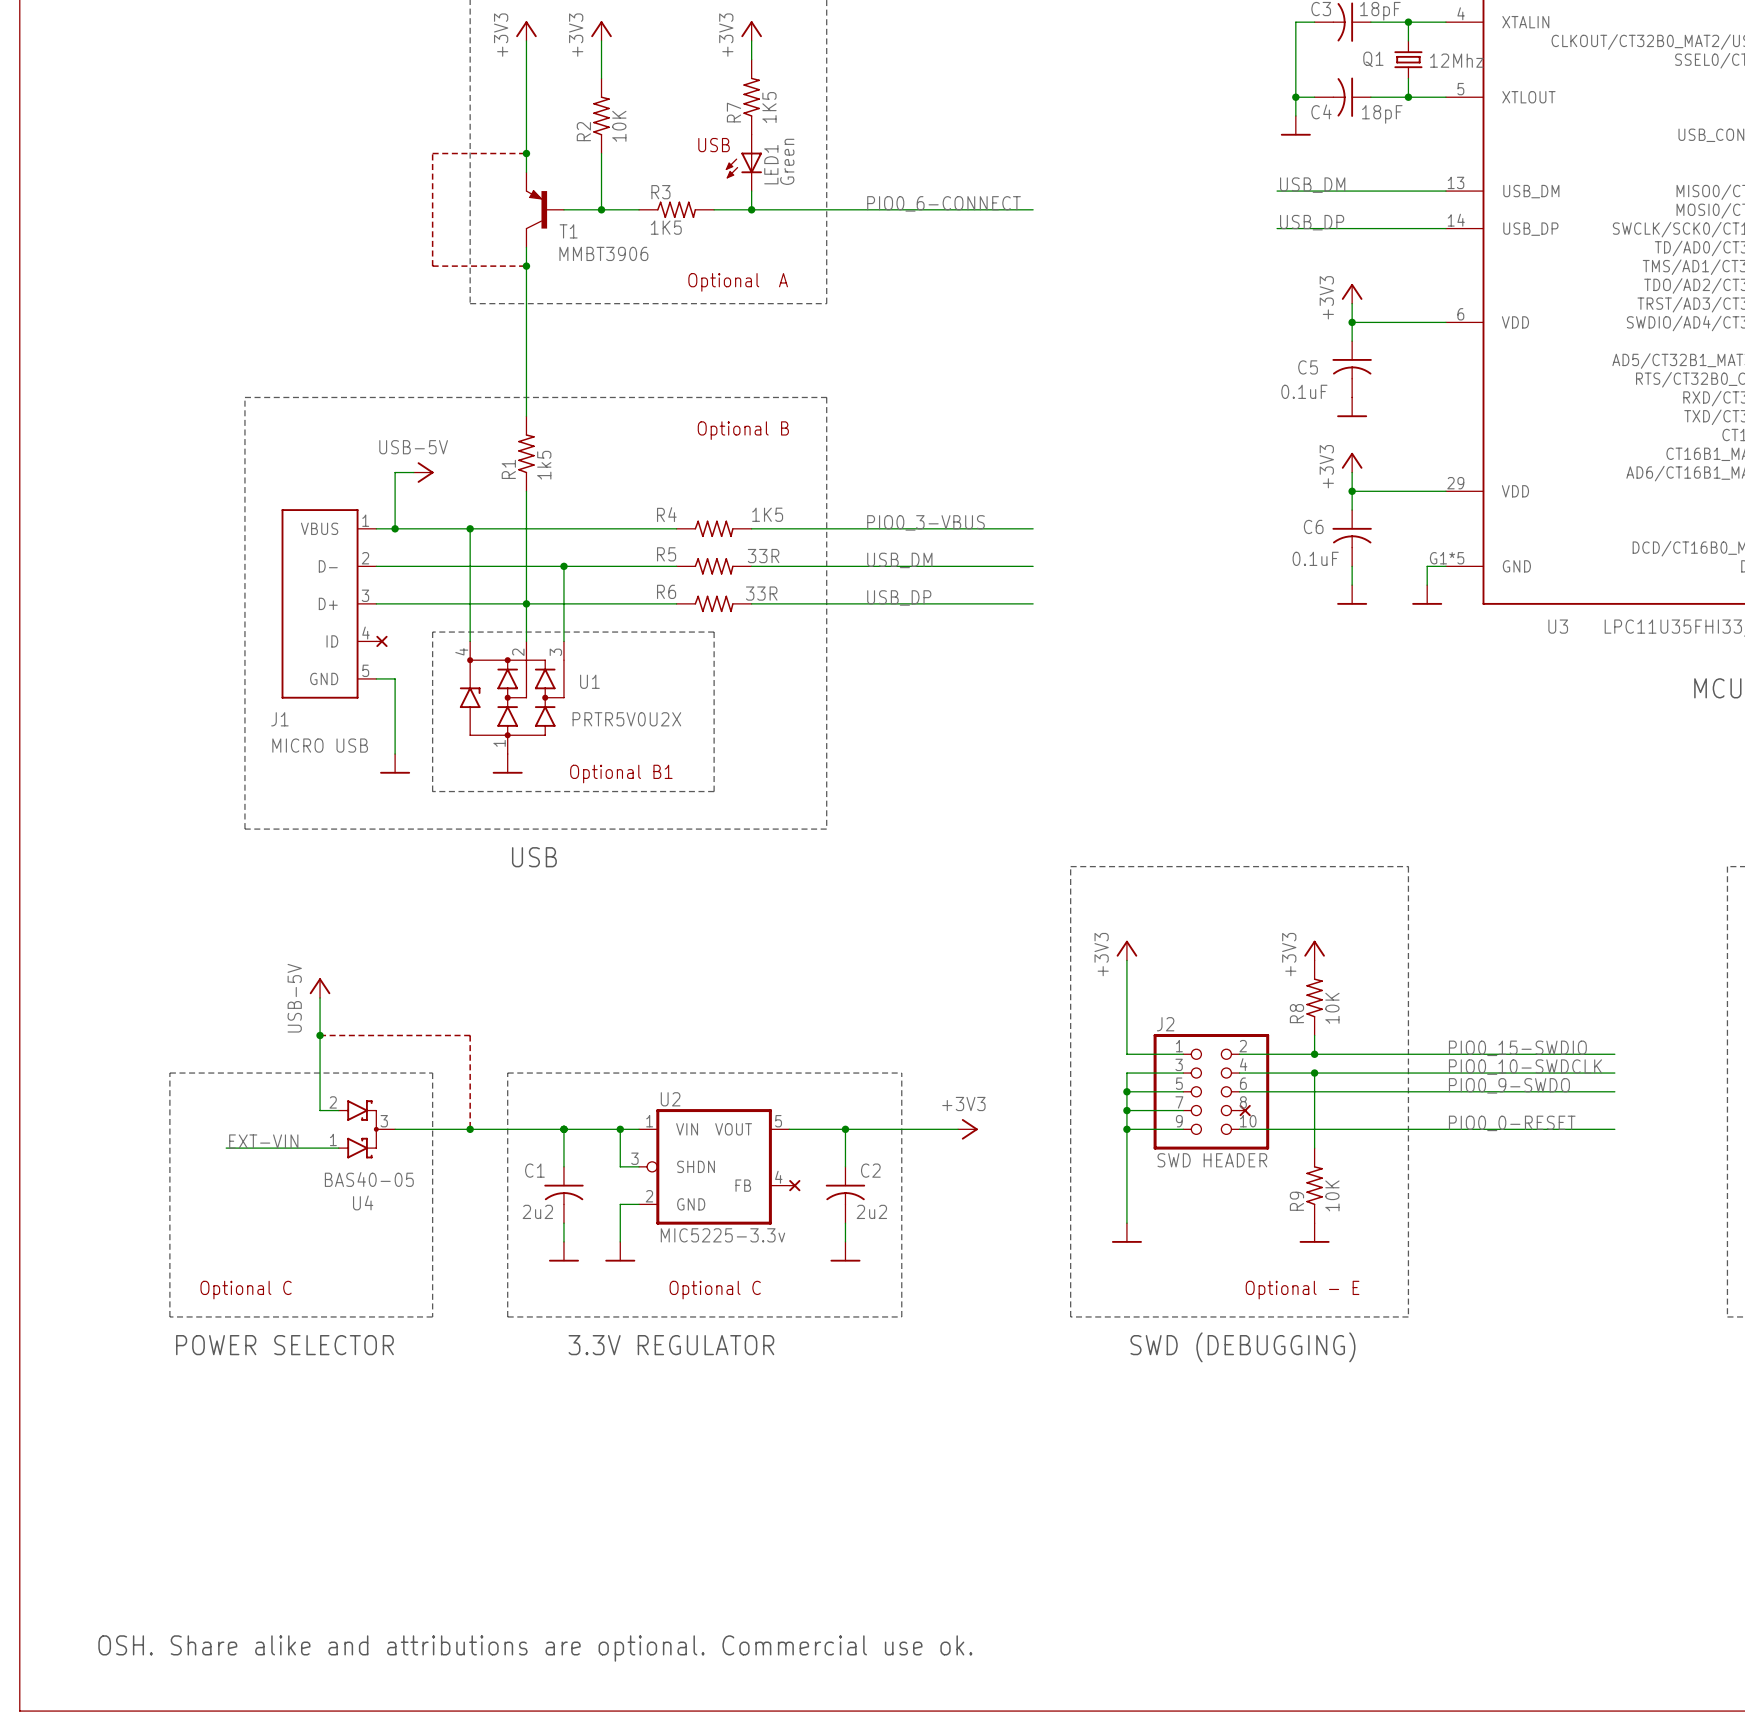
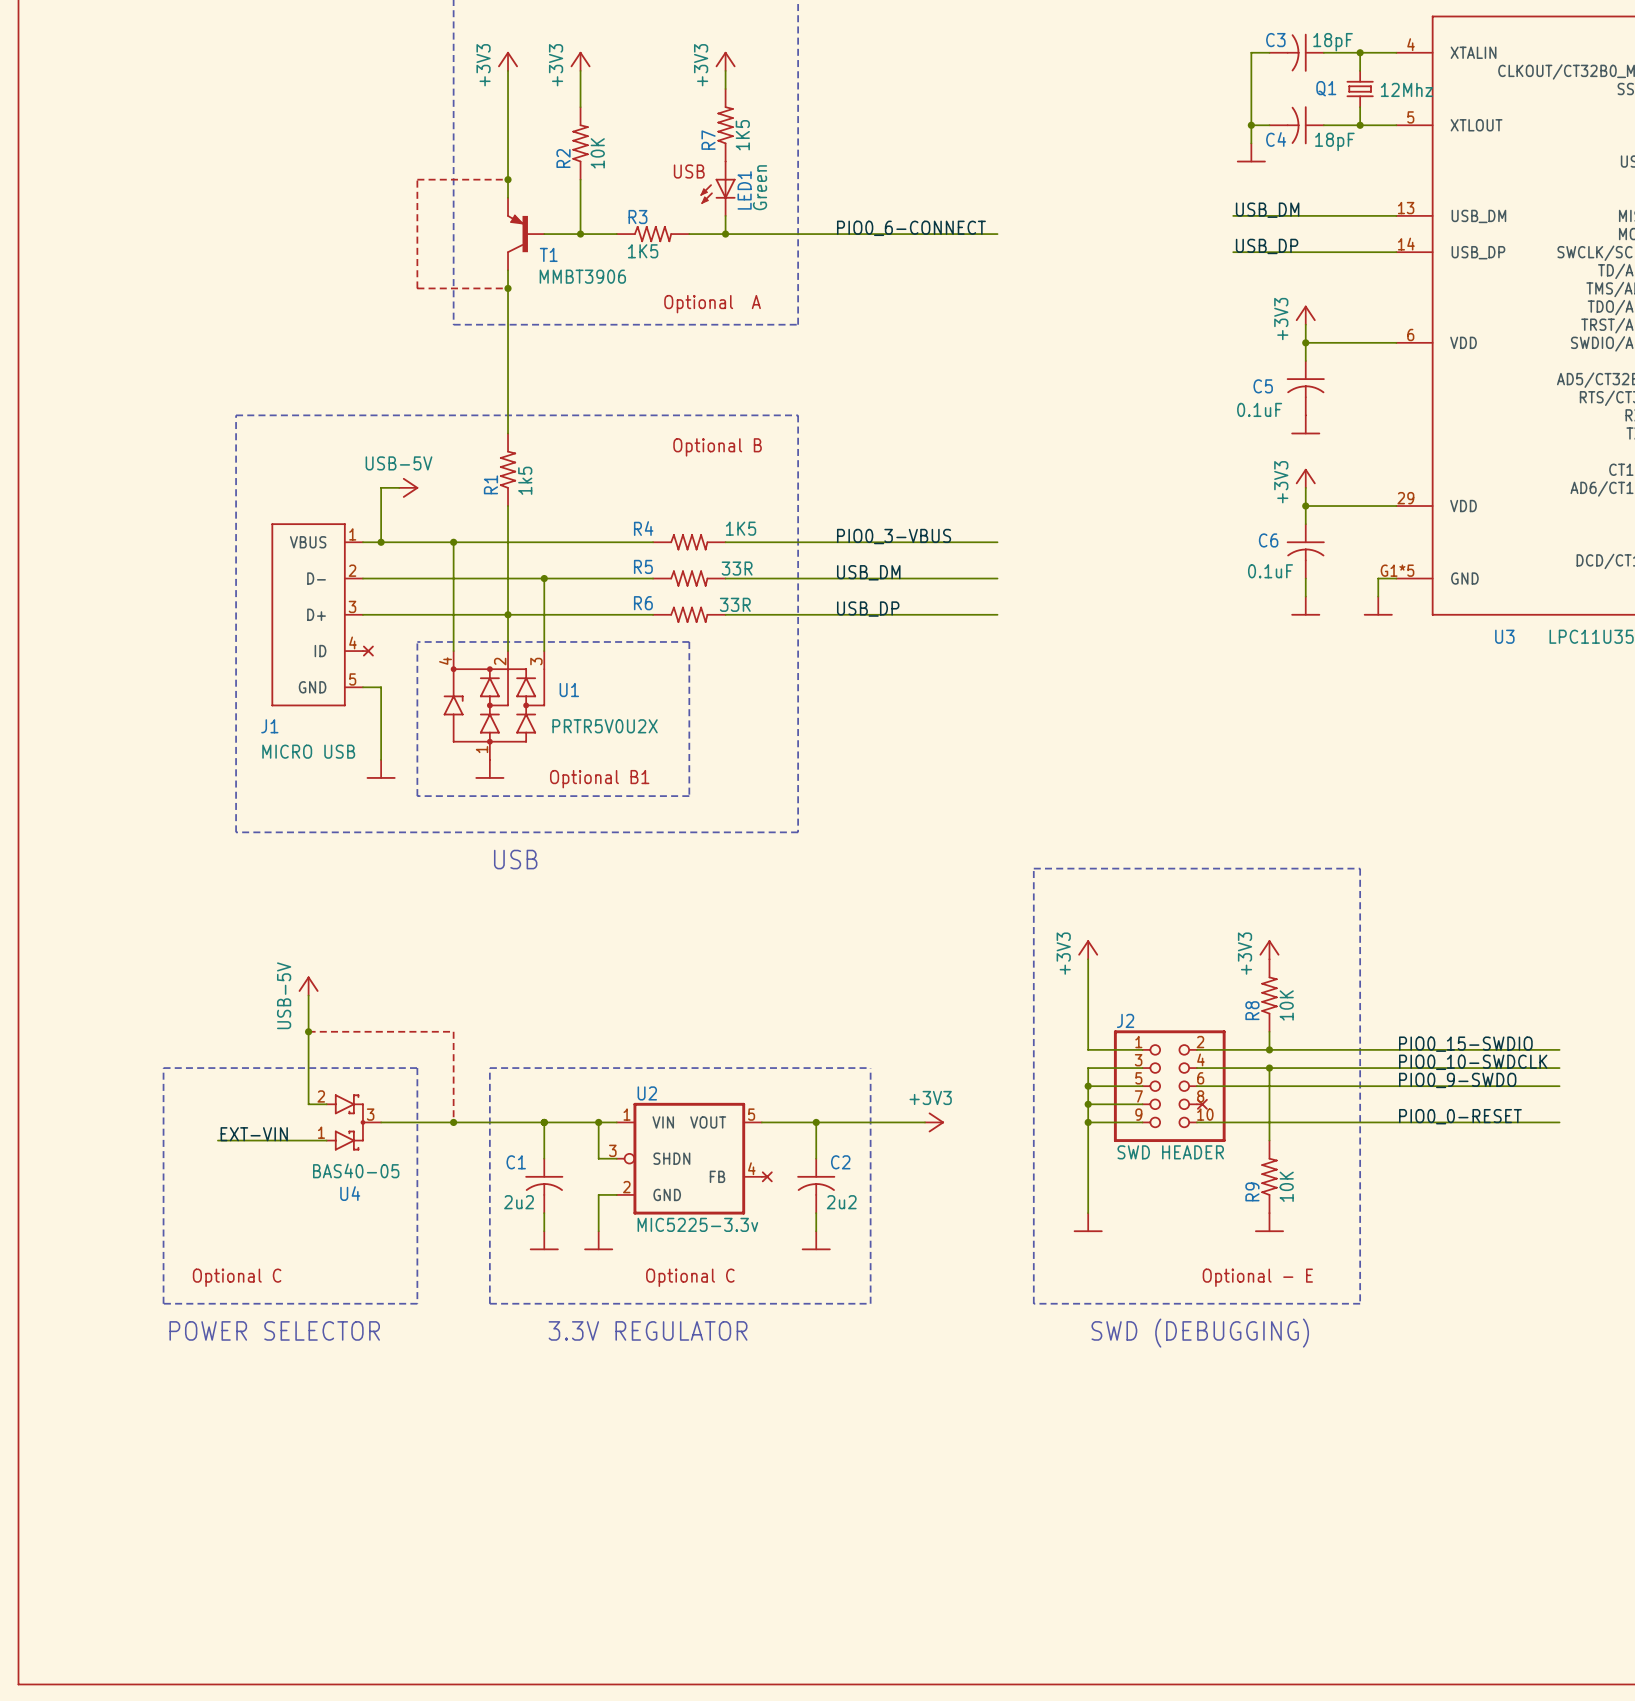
text: OSH. Share alike and attributions are optional. Commercial use ok. (535, 1648) -> none

